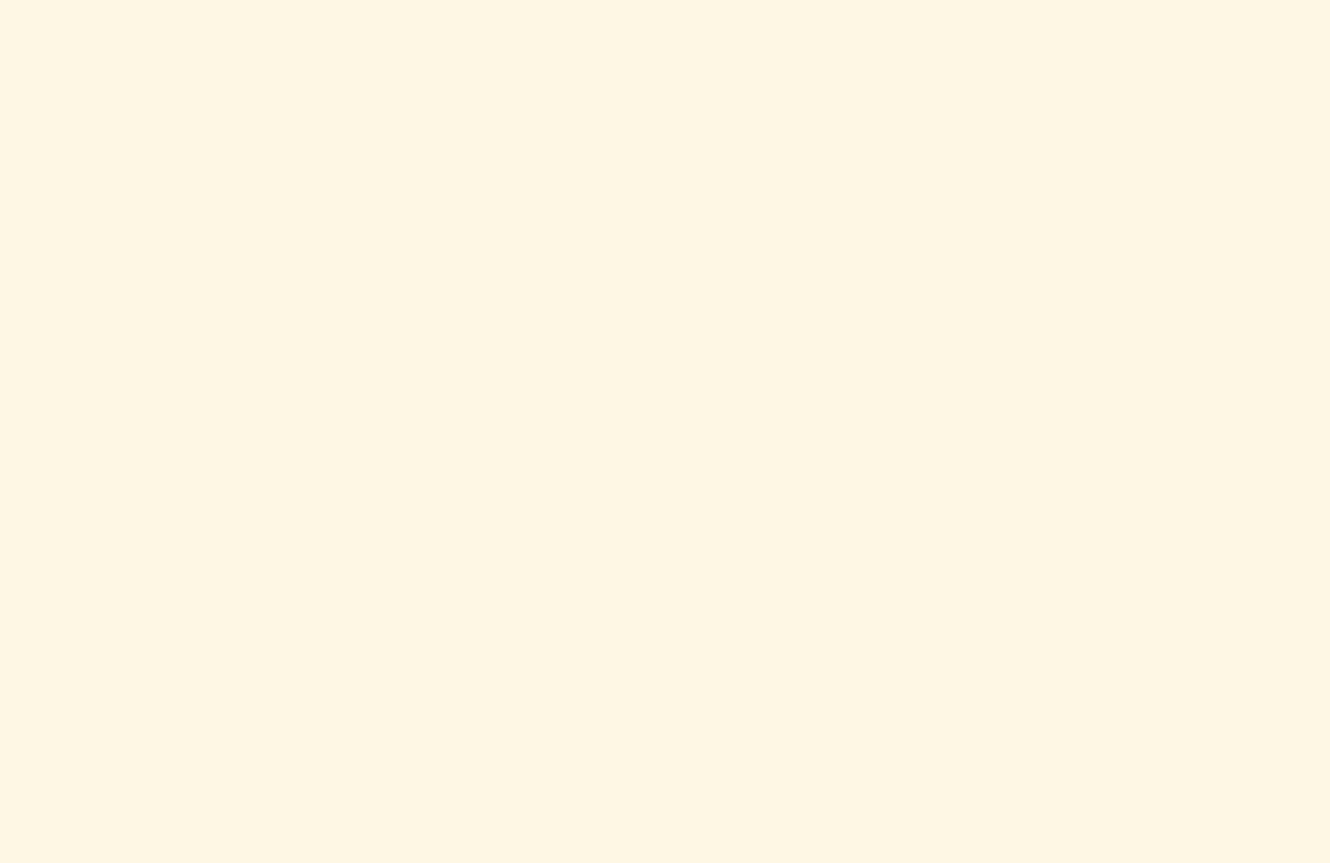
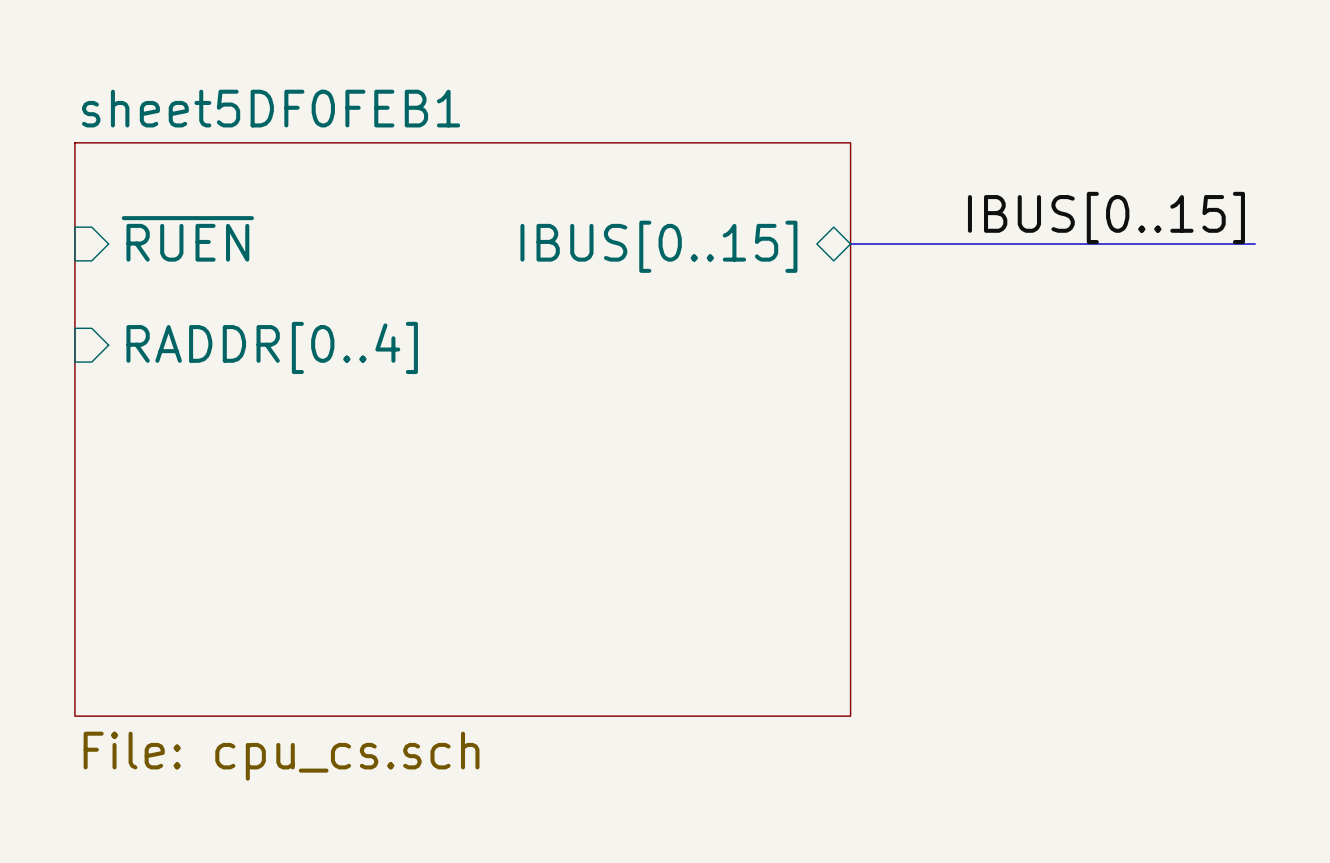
label: none -> IBUS[0..15] (1106, 217)
sheet pin: none -> ~{RUEN} (187, 238)
bus: none -> (850, 244) (1255, 244)
sheet pin: none -> IBUS[0..15] (658, 246)
sheet pin: none -> RADDR[0..4] (272, 347)
sheet sheet5DF0FEB1: none -> File: cpu_cs.sch (462, 429)

